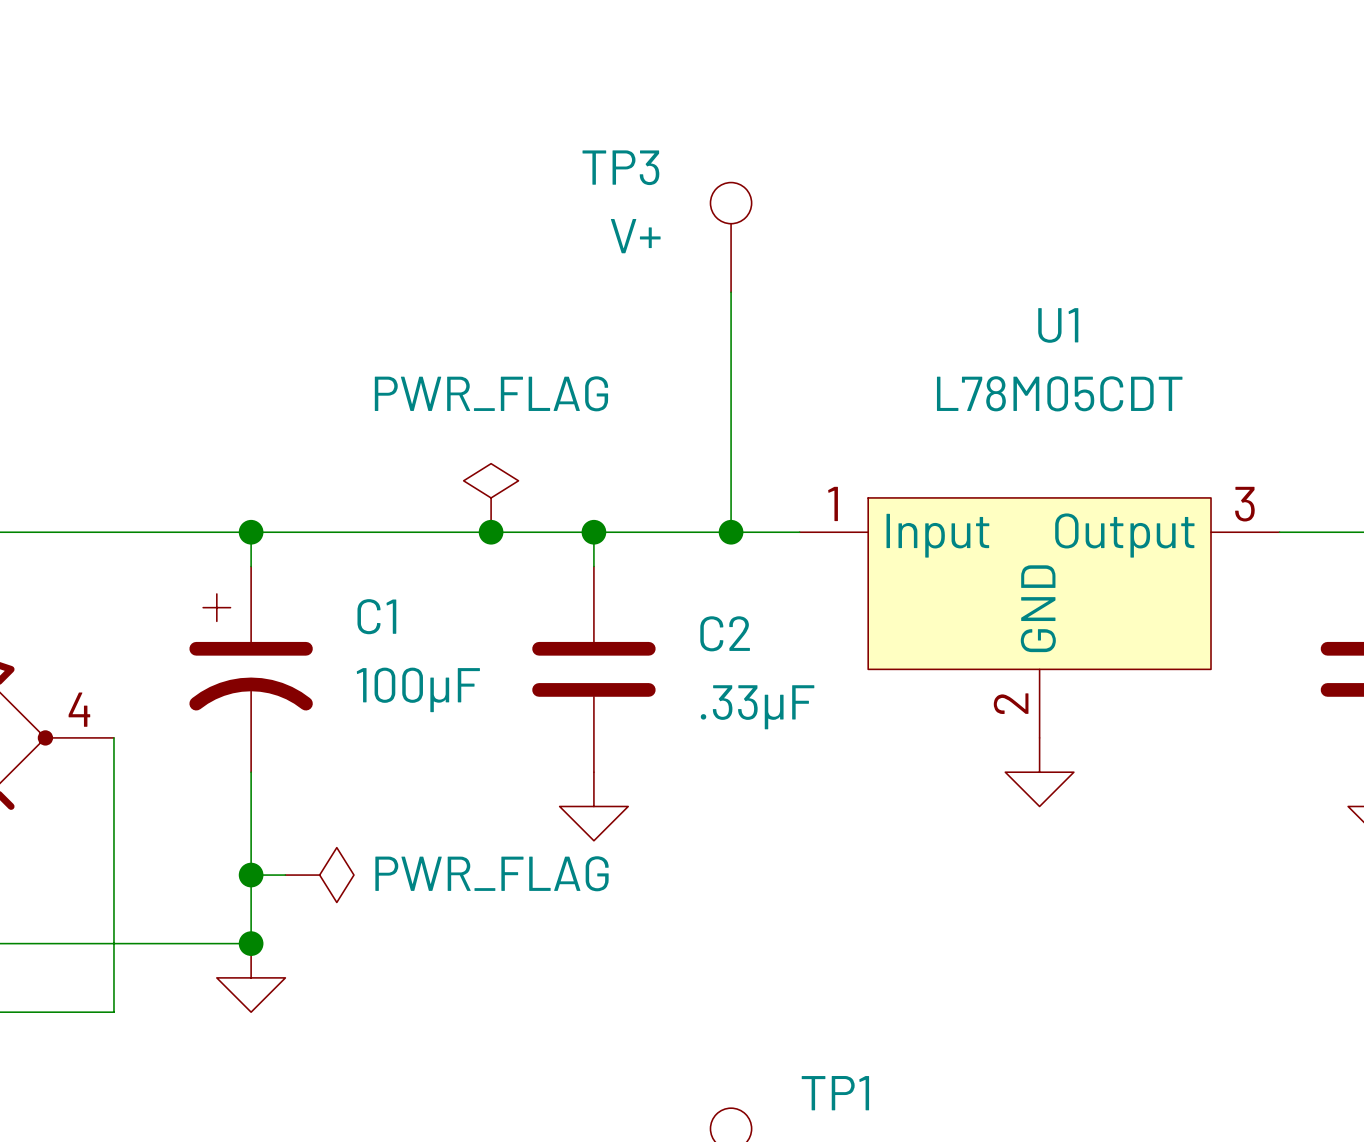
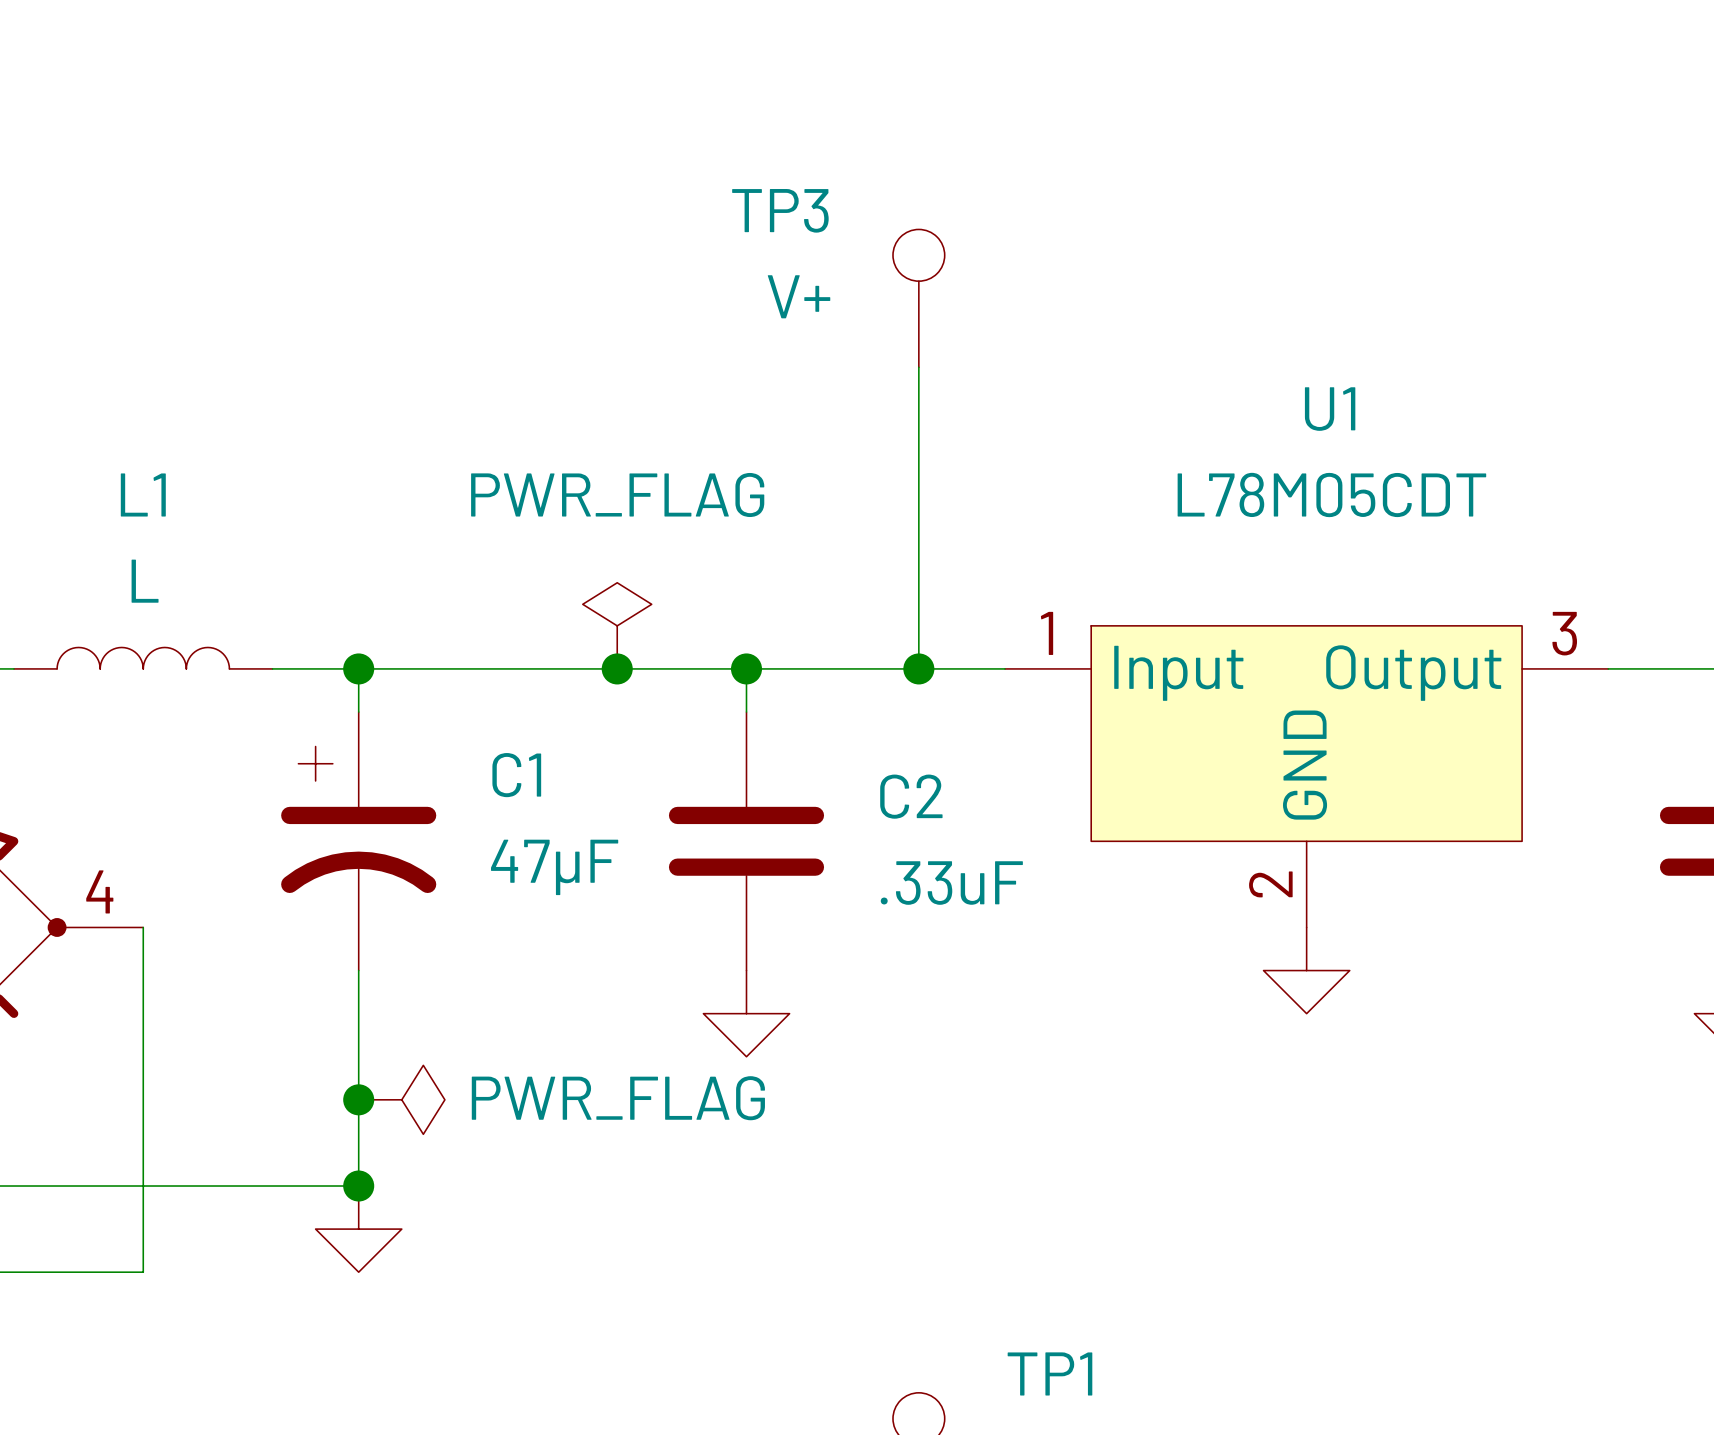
L1: none -> L (143, 658)
wire: (11, 532) (216, 532) -> none
wire: (251, 532) (251, 566) -> (358, 668) (358, 712)
junction position: (251, 532) -> (358, 668)
C1 position: (251, 669) -> (358, 841)
C1 value: 100µF (418, 689) -> 47µF (554, 867)
C2 value: .33µF (757, 707) -> .33uF (951, 883)
wire: (251, 772) (251, 943) -> (358, 970) (358, 1186) (315, 1186)
wire: (251, 875) (285, 875) -> none
junction position: (251, 875) -> (358, 1099)
junction position: (251, 943) -> (358, 1186)
power symbol position: (251, 977) -> (358, 1229)

